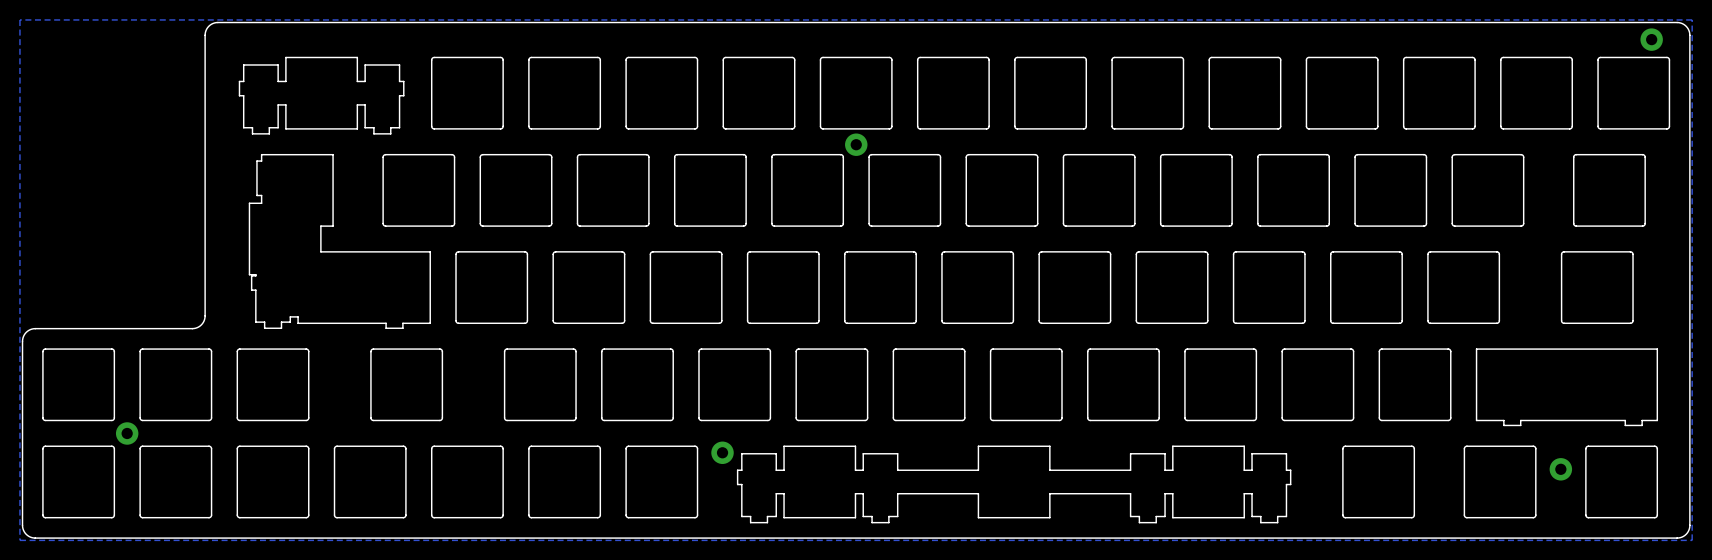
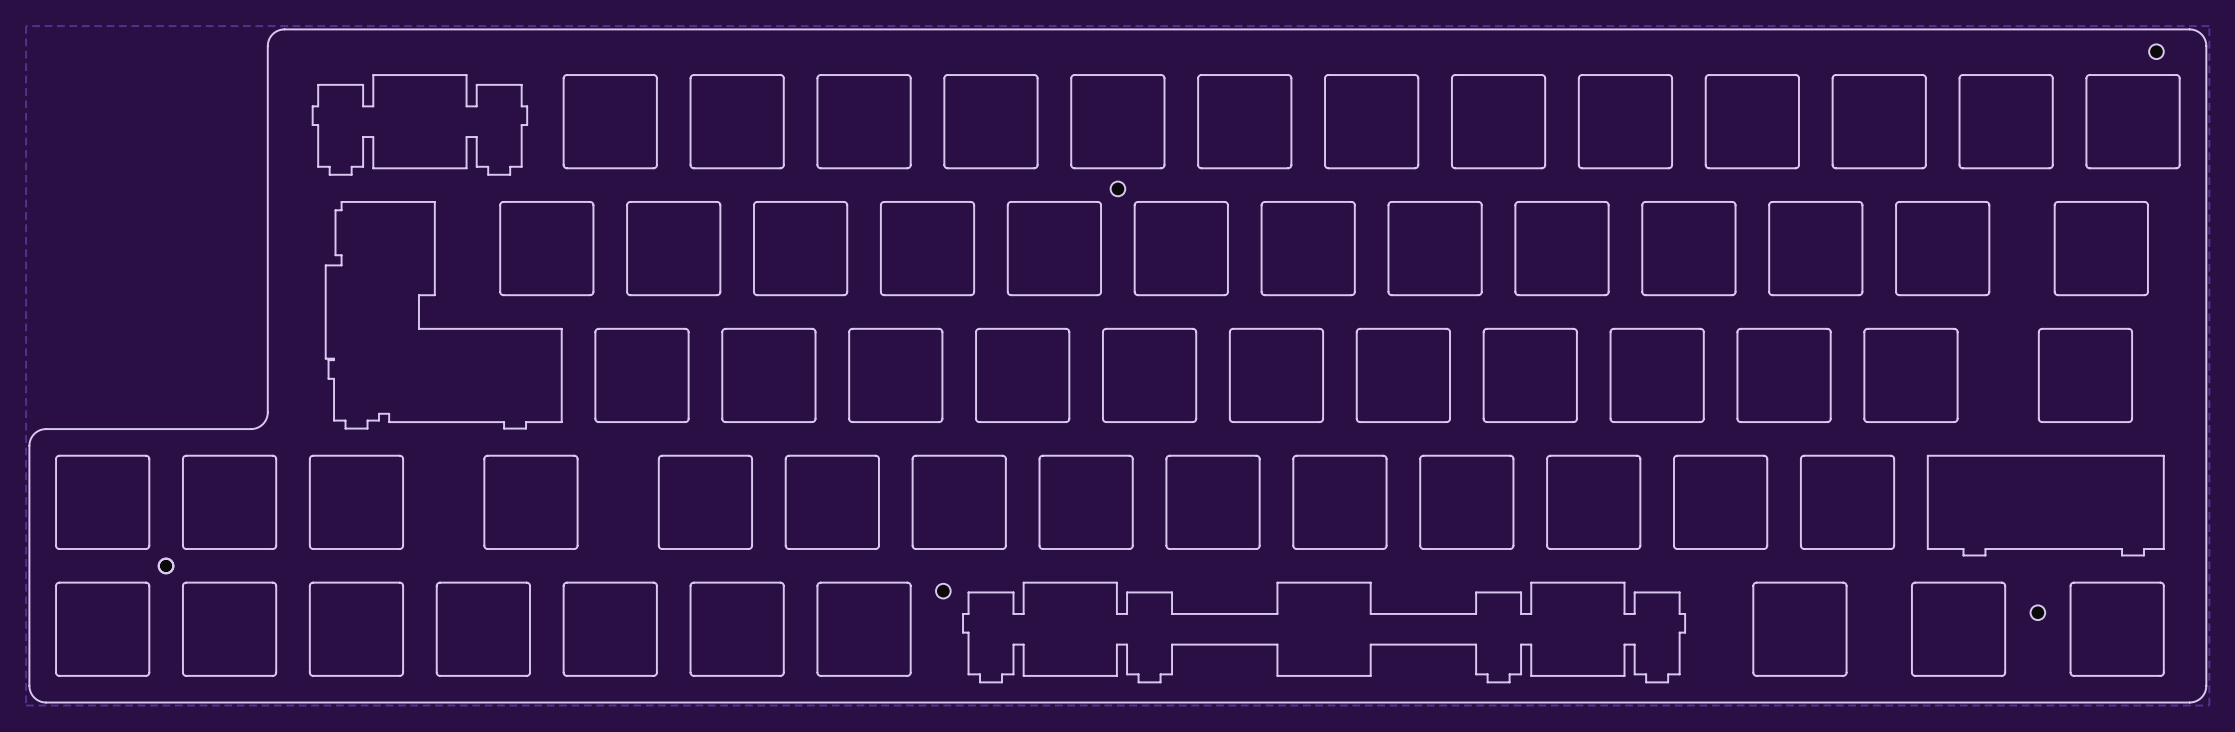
part footprint: [1640, 28, 1663, 51] -> [2149, 44, 2164, 60]
part footprint: [845, 133, 868, 156] -> [1110, 181, 1126, 197]
part footprint: [115, 422, 139, 445] -> [158, 558, 174, 574]
part footprint: [711, 441, 734, 465] -> [936, 583, 951, 599]
part footprint: [1549, 458, 1573, 481] -> [2030, 605, 2046, 621]

